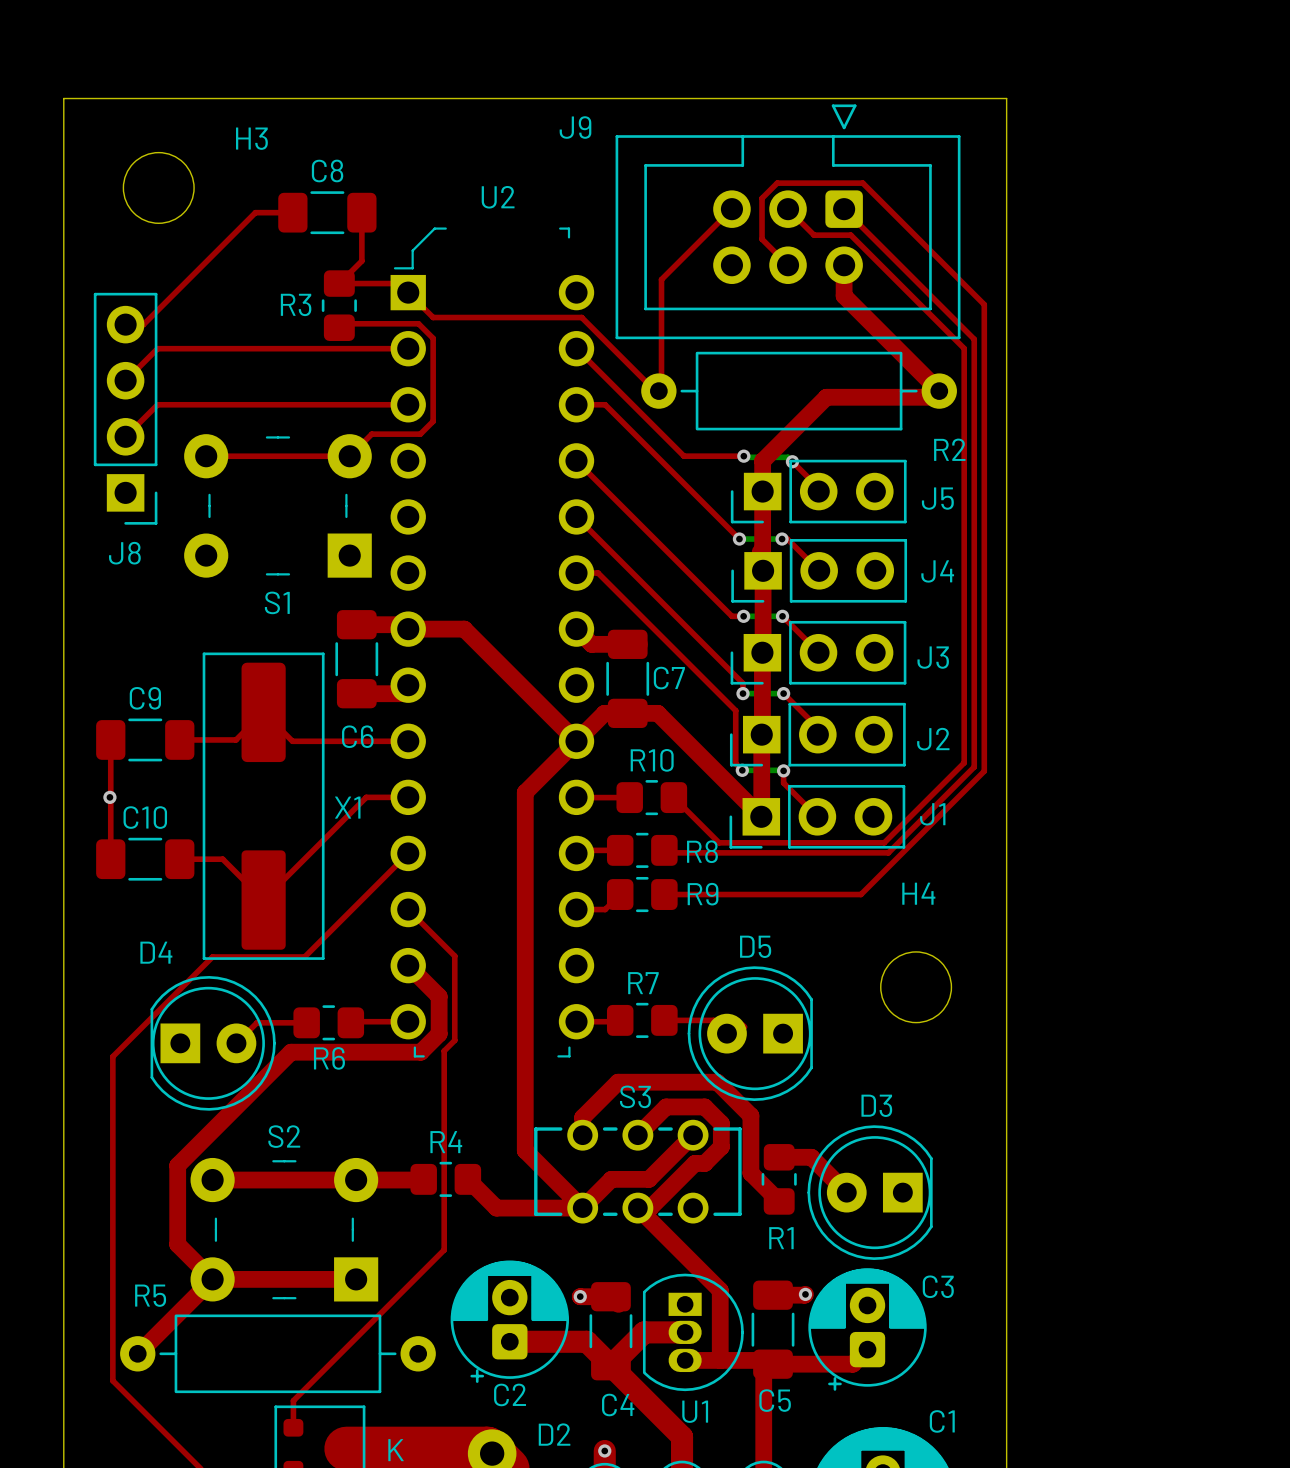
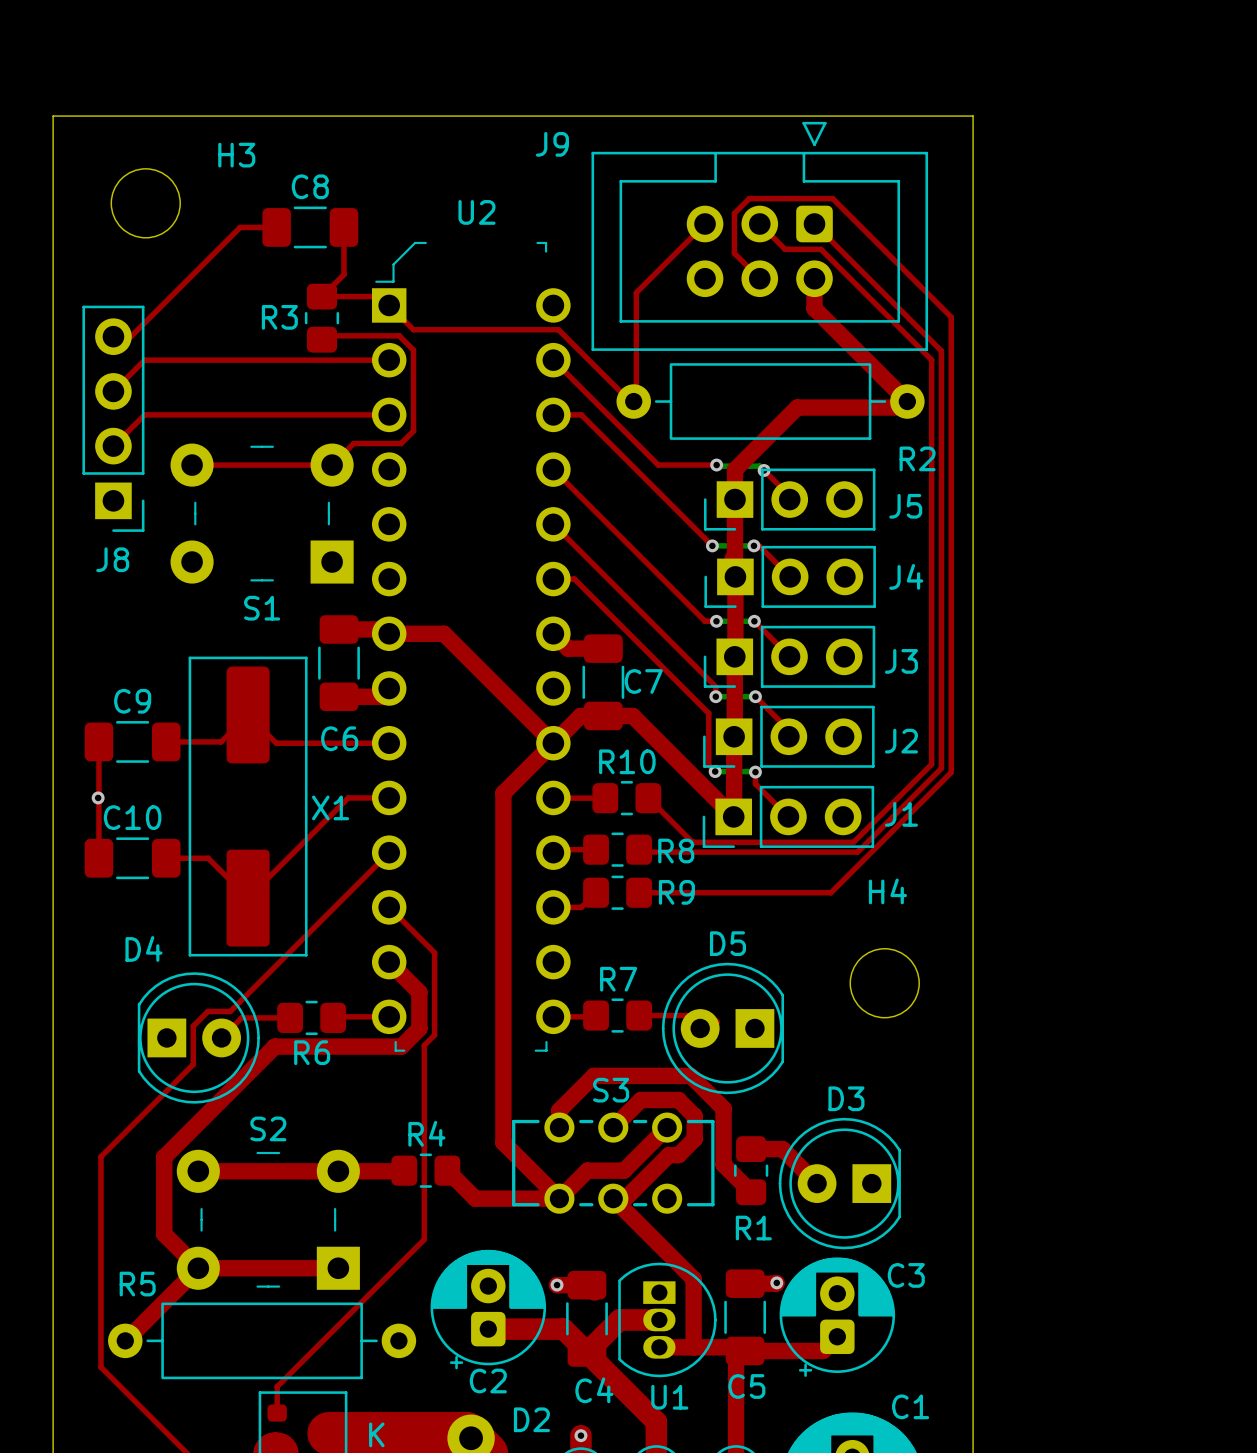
top track: (304, 956) (212, 956) (112, 1056) (112, 1165) -> (288, 953) (230, 1011) (207, 1011) (193, 1026) (193, 1064) (100, 1156)

